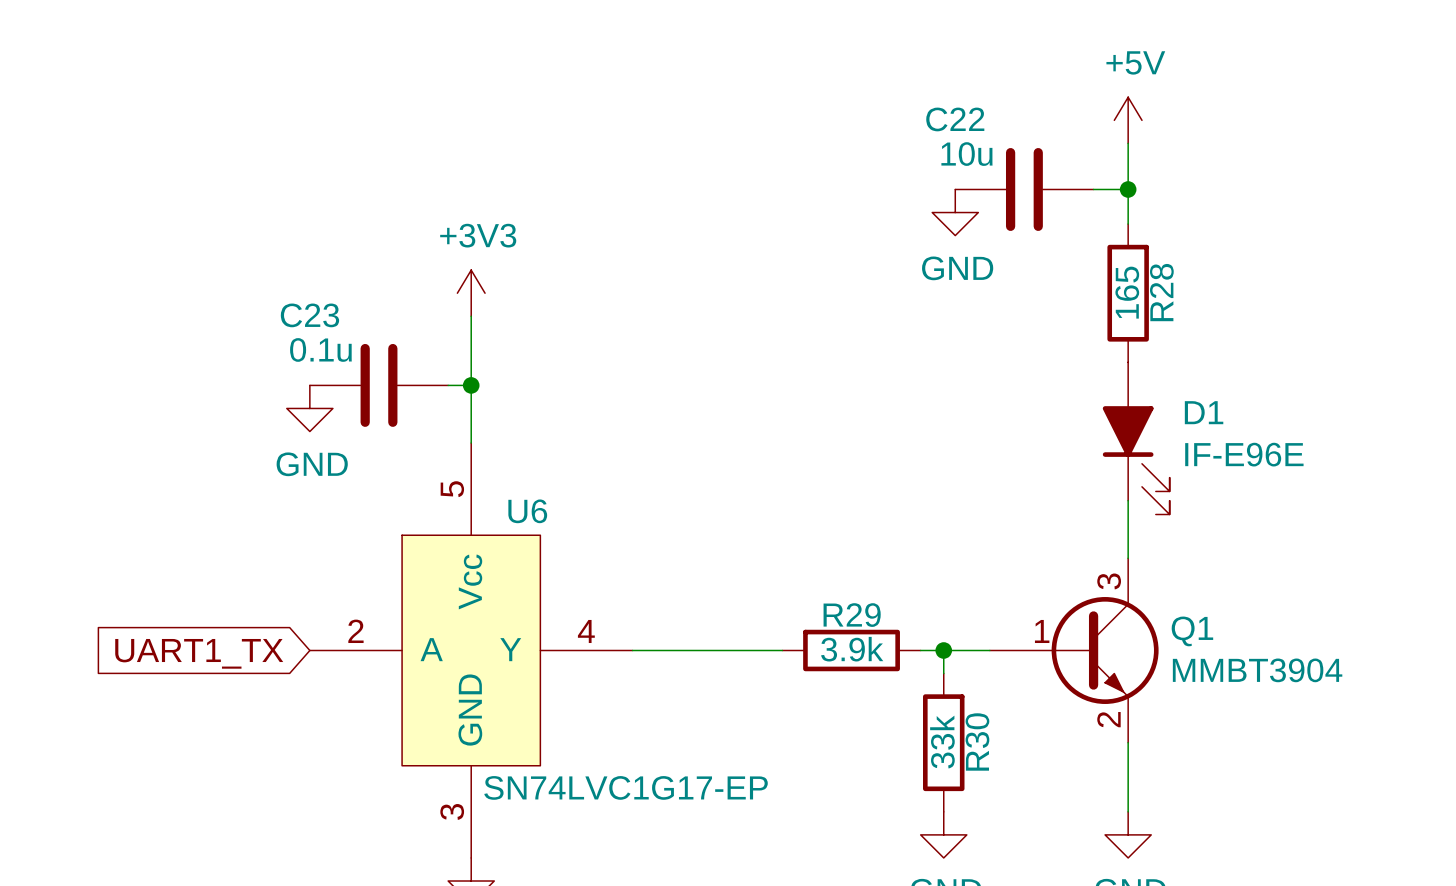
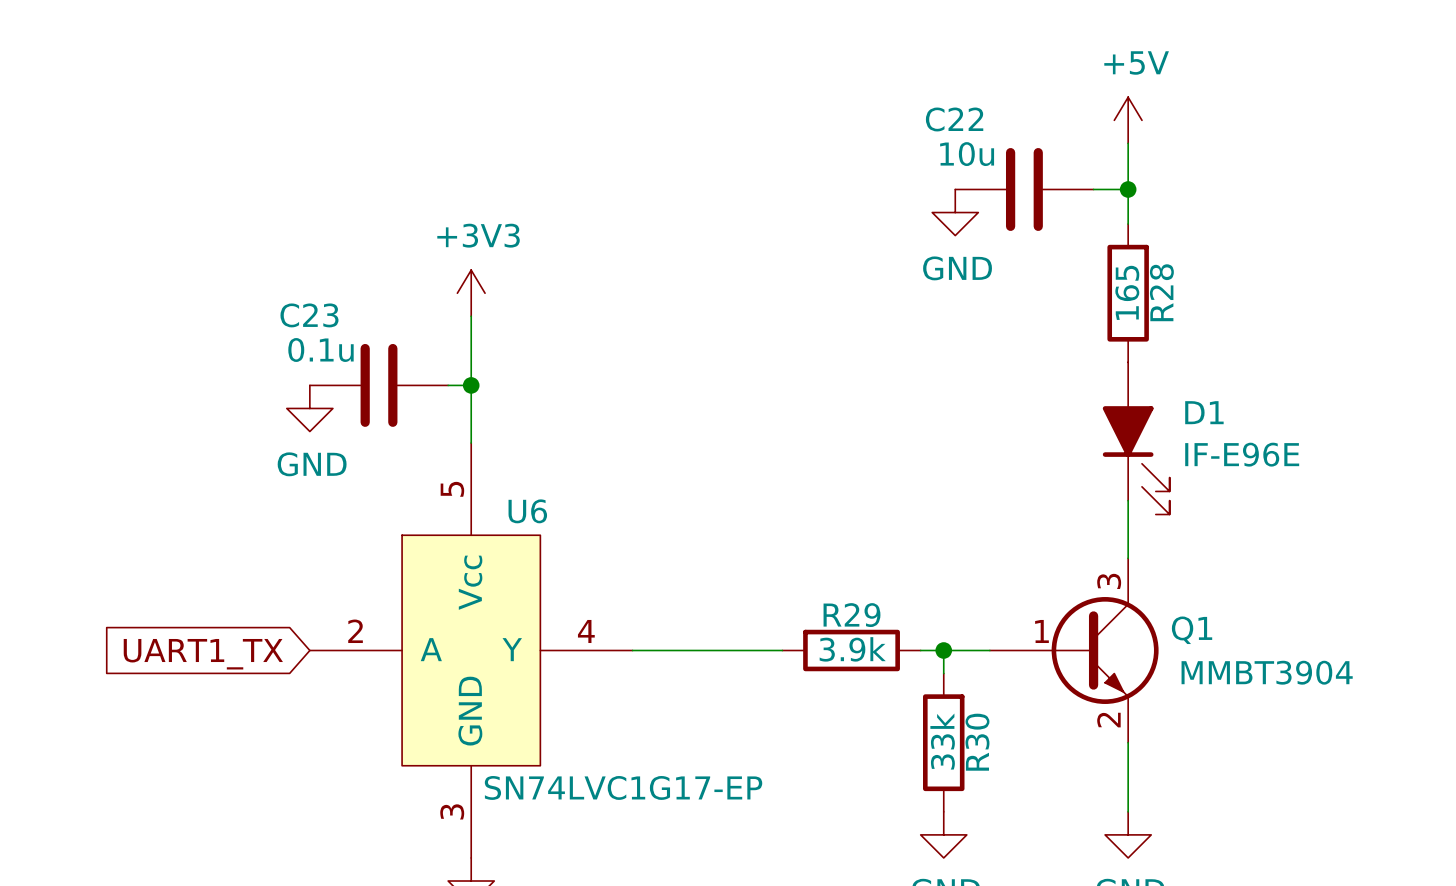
Q1 value: MMBT3904 (1257, 670) -> none
Q1 text: none -> MMBT3904 (1267, 672)

